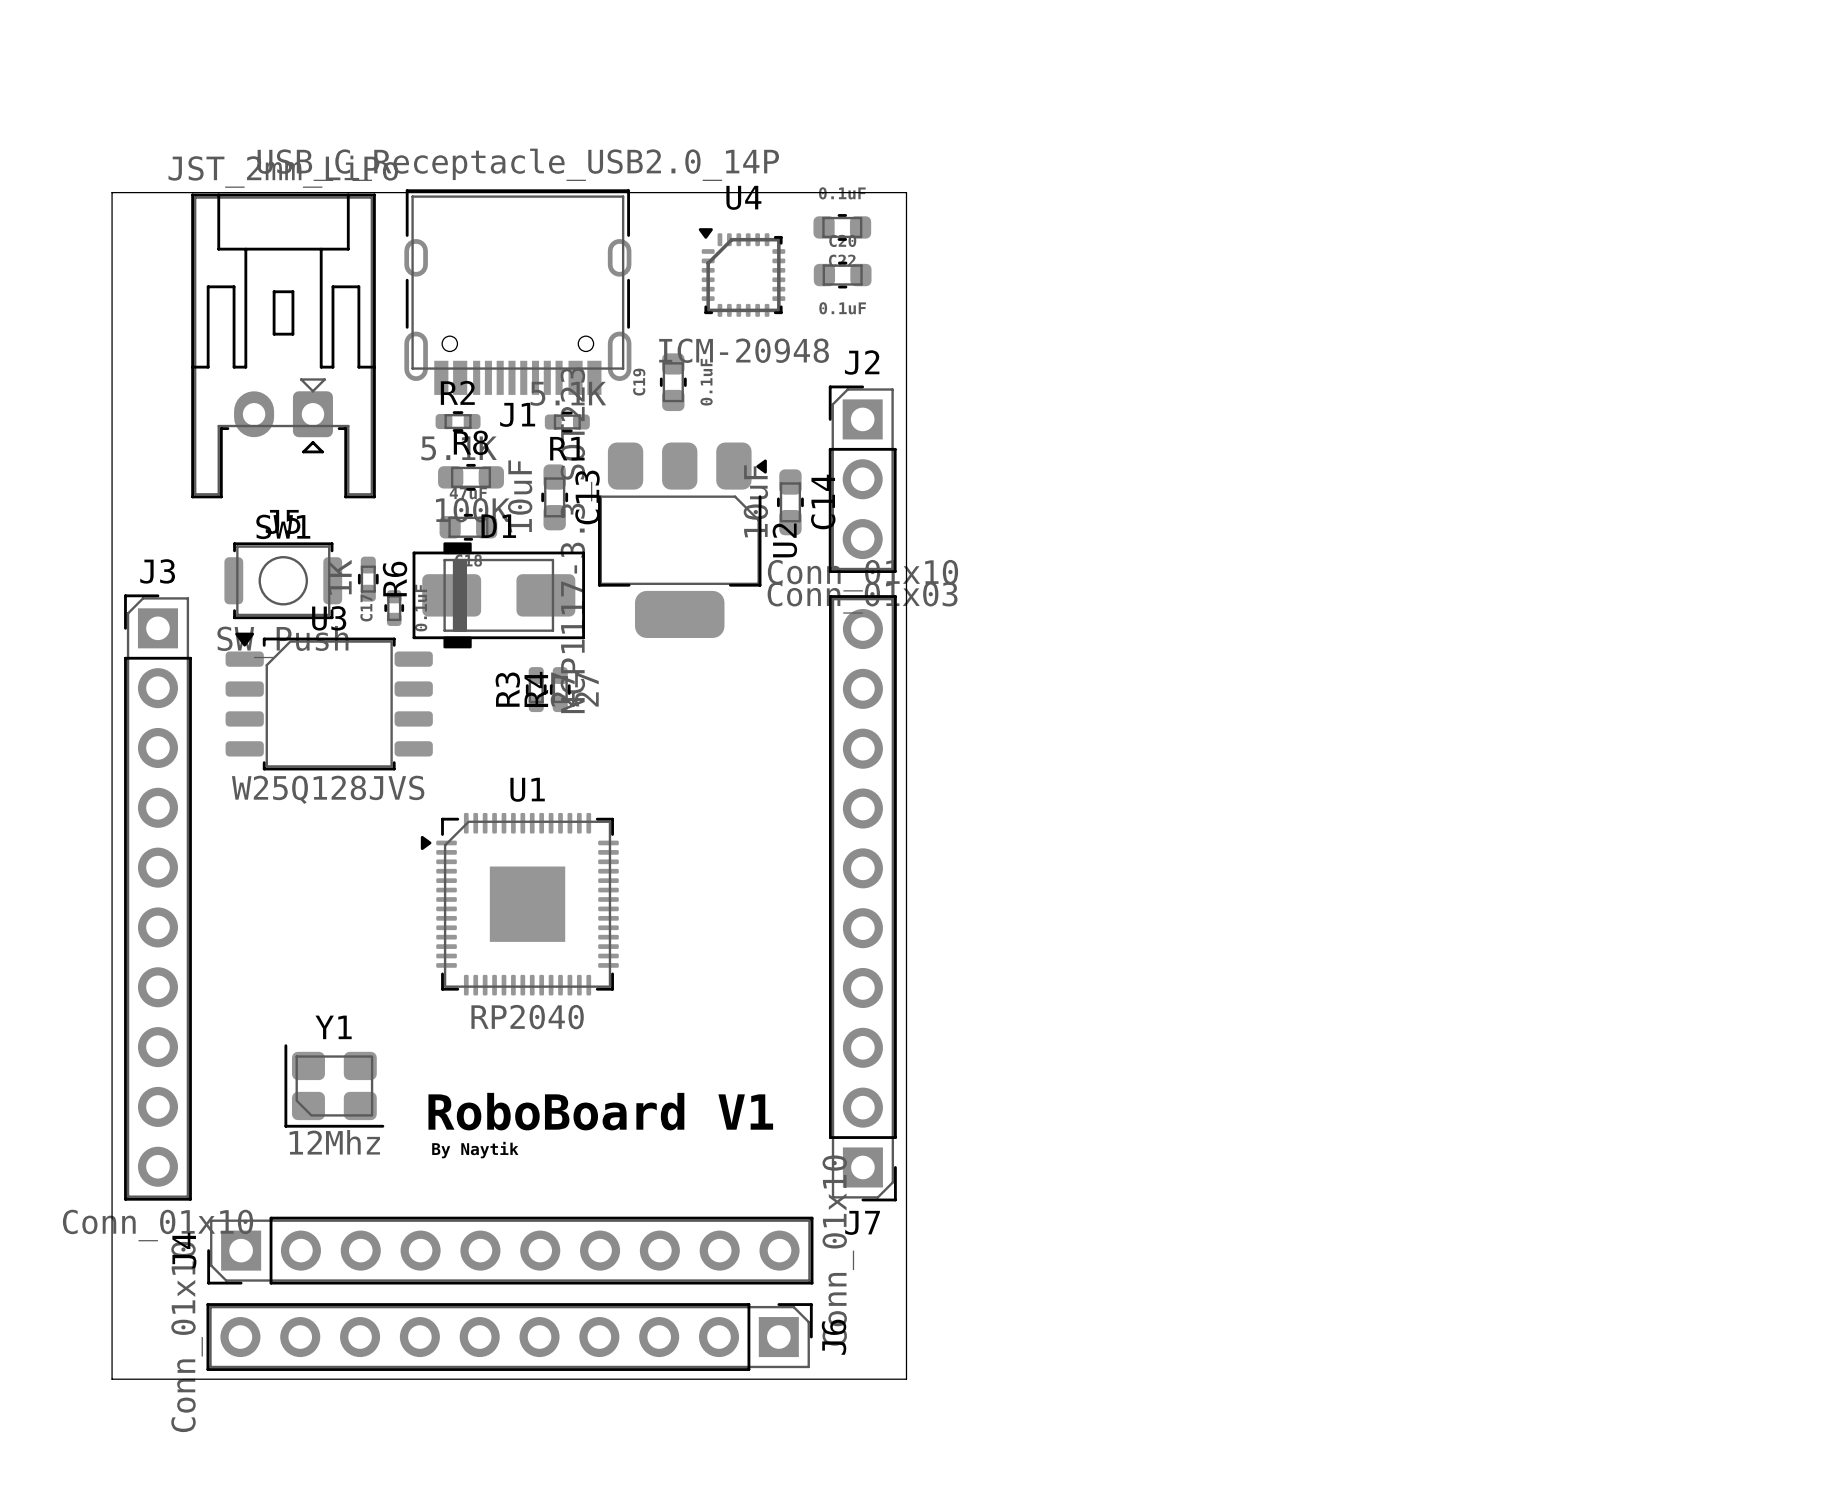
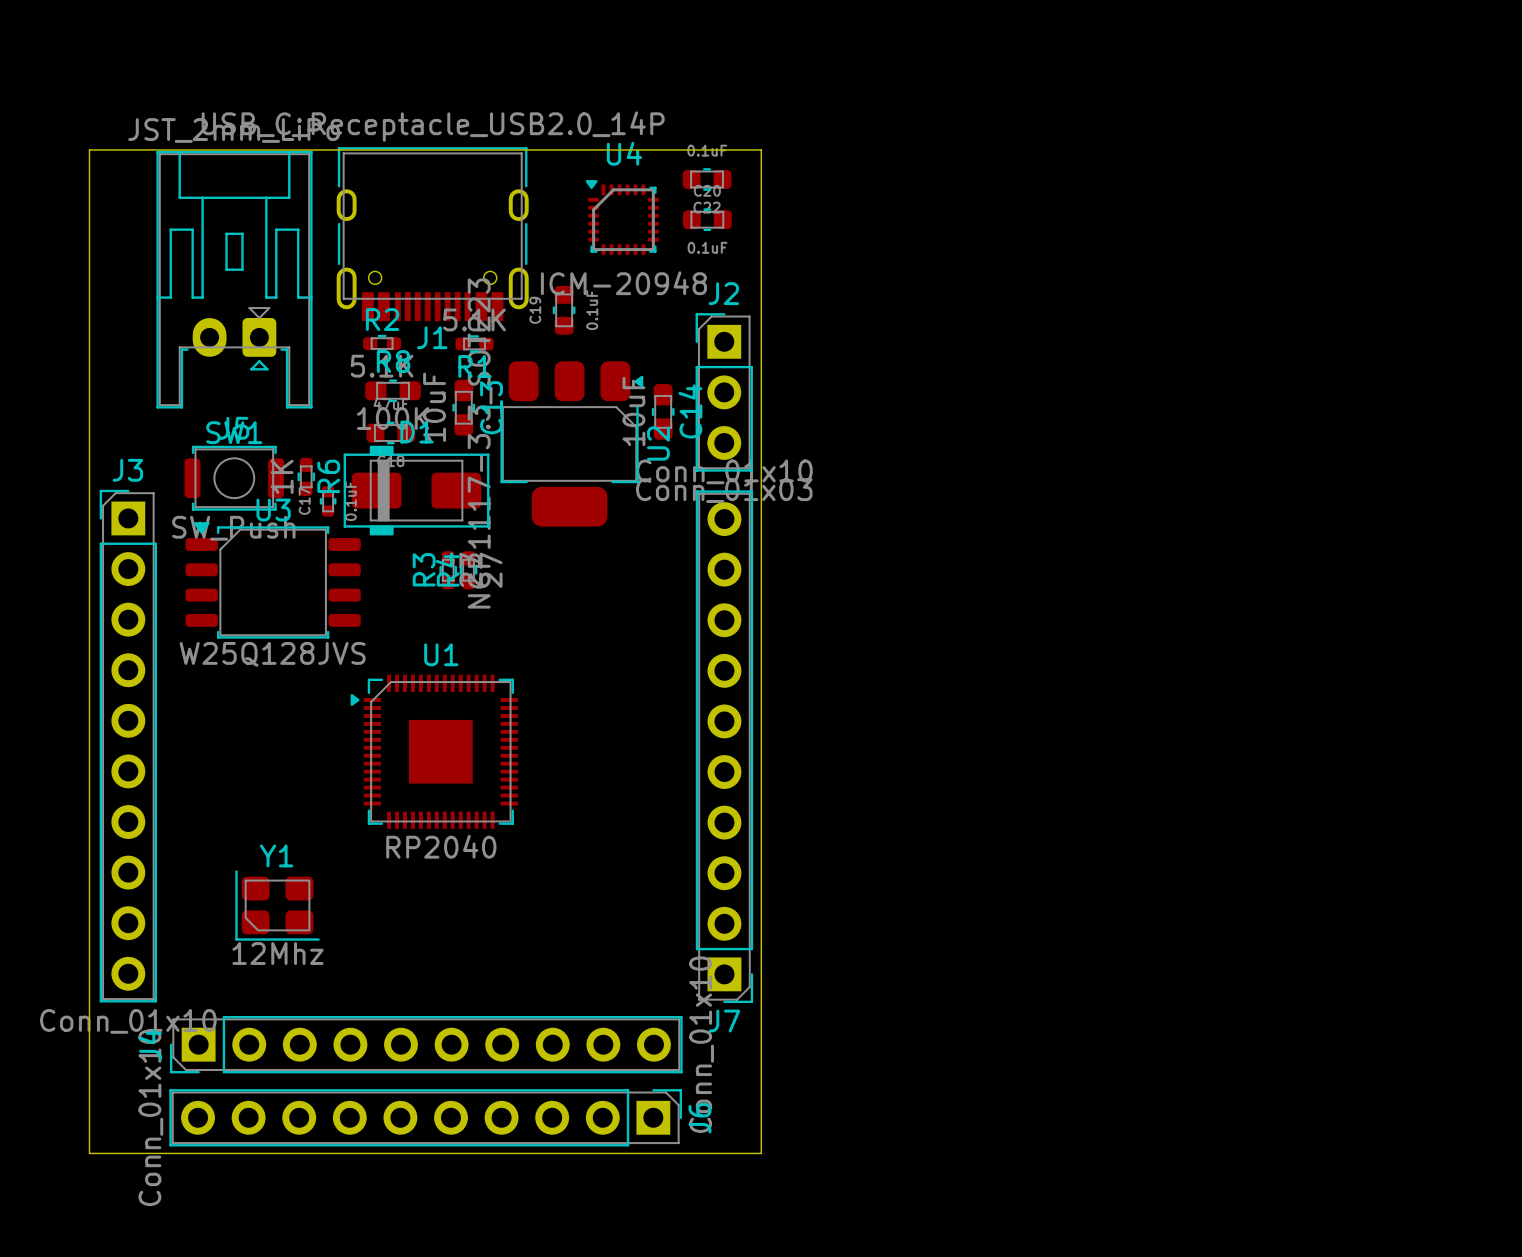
text: RoboBoard V1 (600, 1111) -> none
text: By Naytik (475, 1150) -> none

